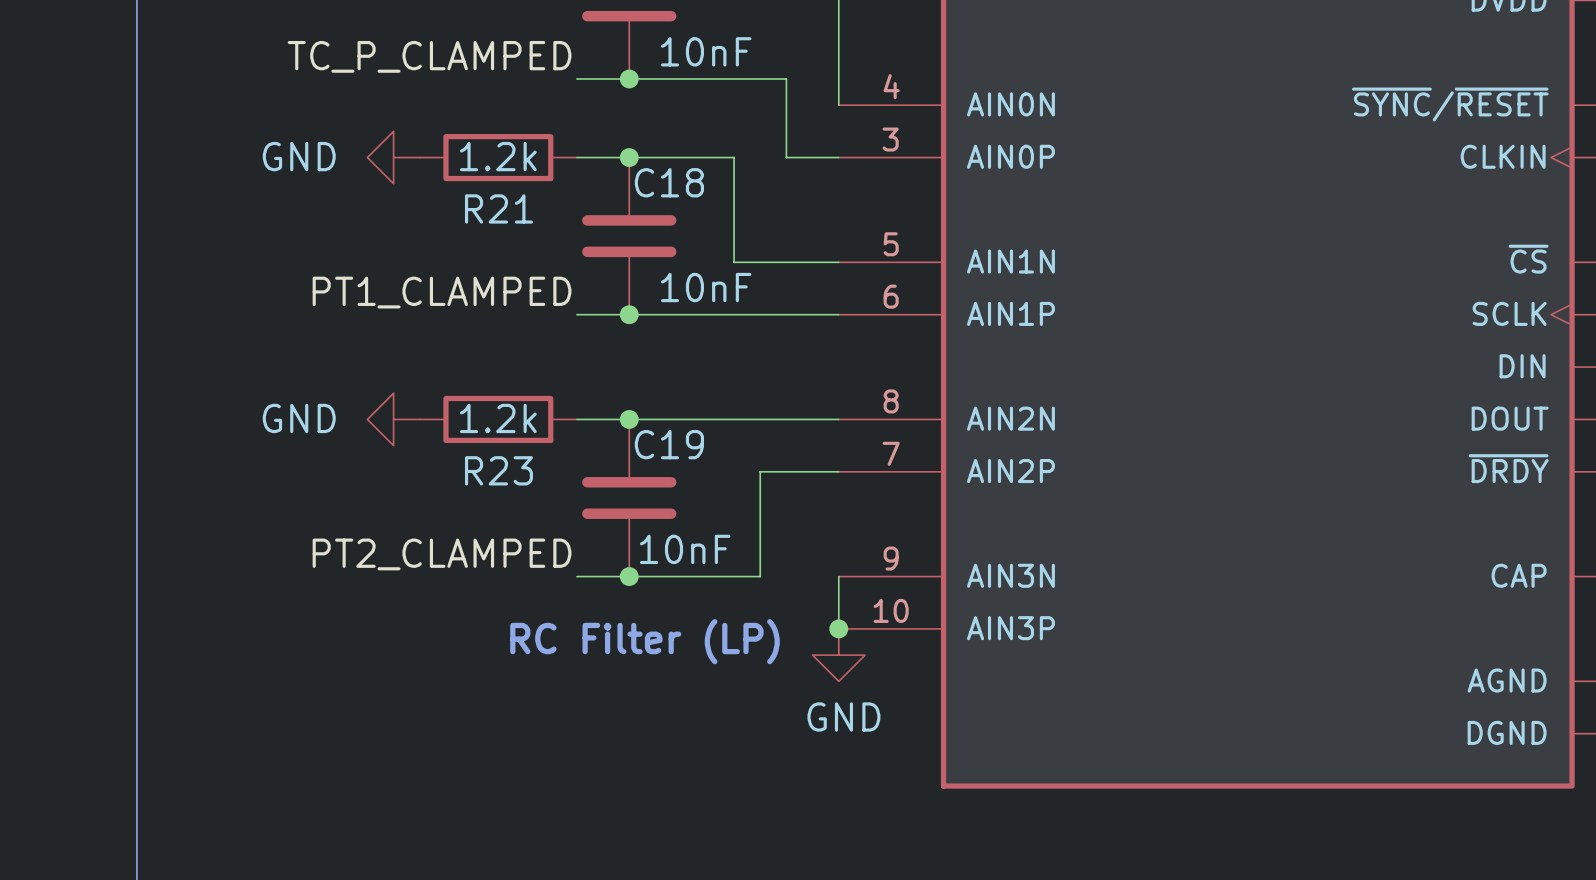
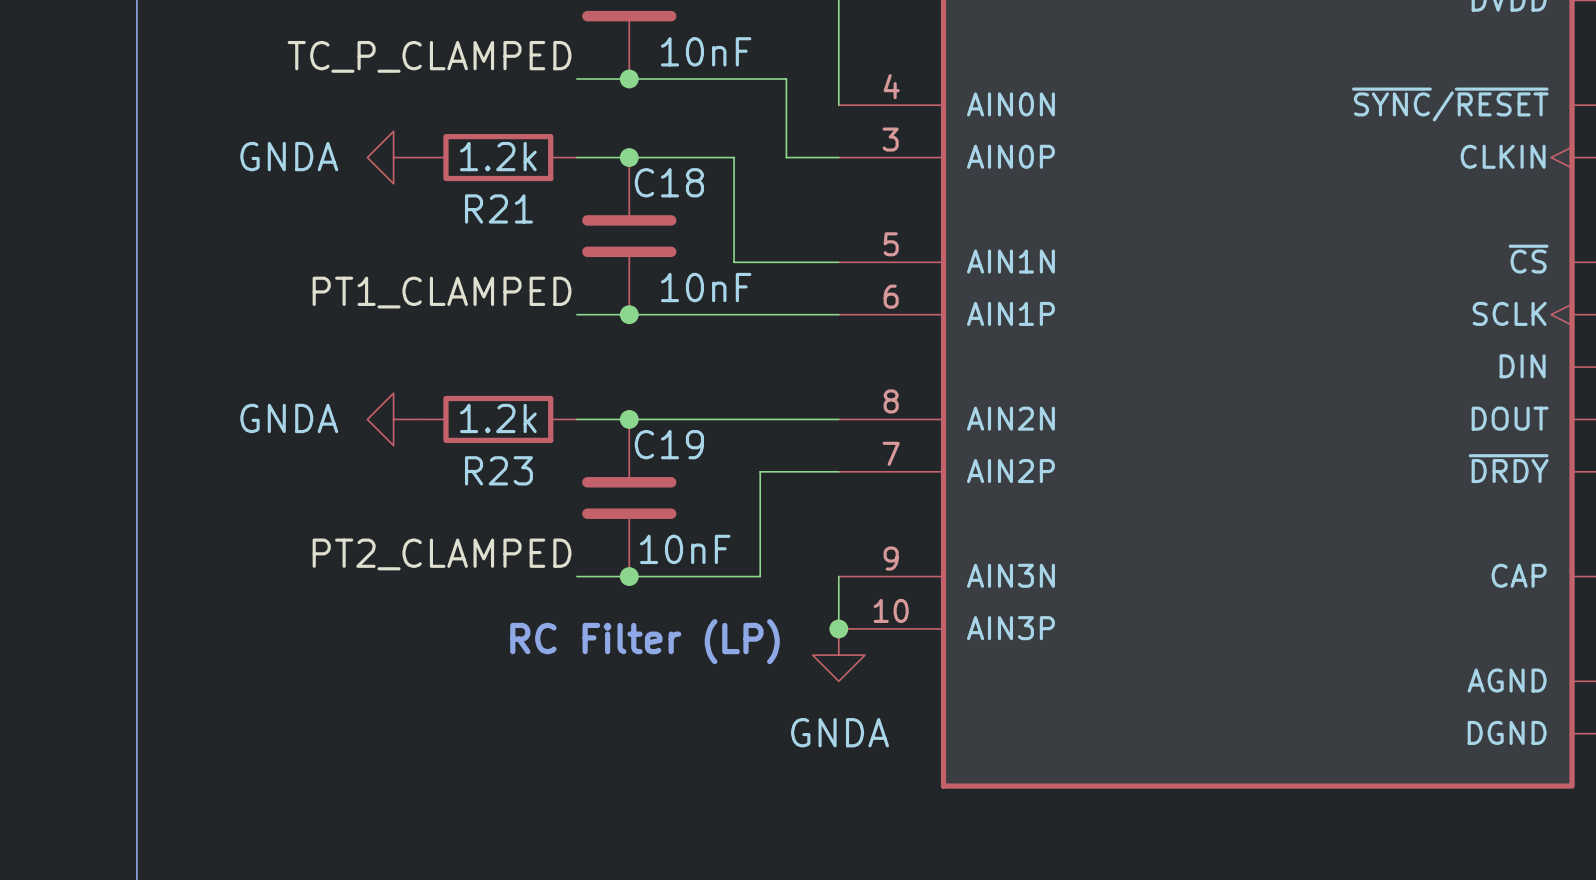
power symbol: GND (393, 157) -> GNDA (393, 157)
power symbol: GND (393, 419) -> GNDA (393, 419)
power symbol: GND (838, 655) -> GNDA (838, 655)

